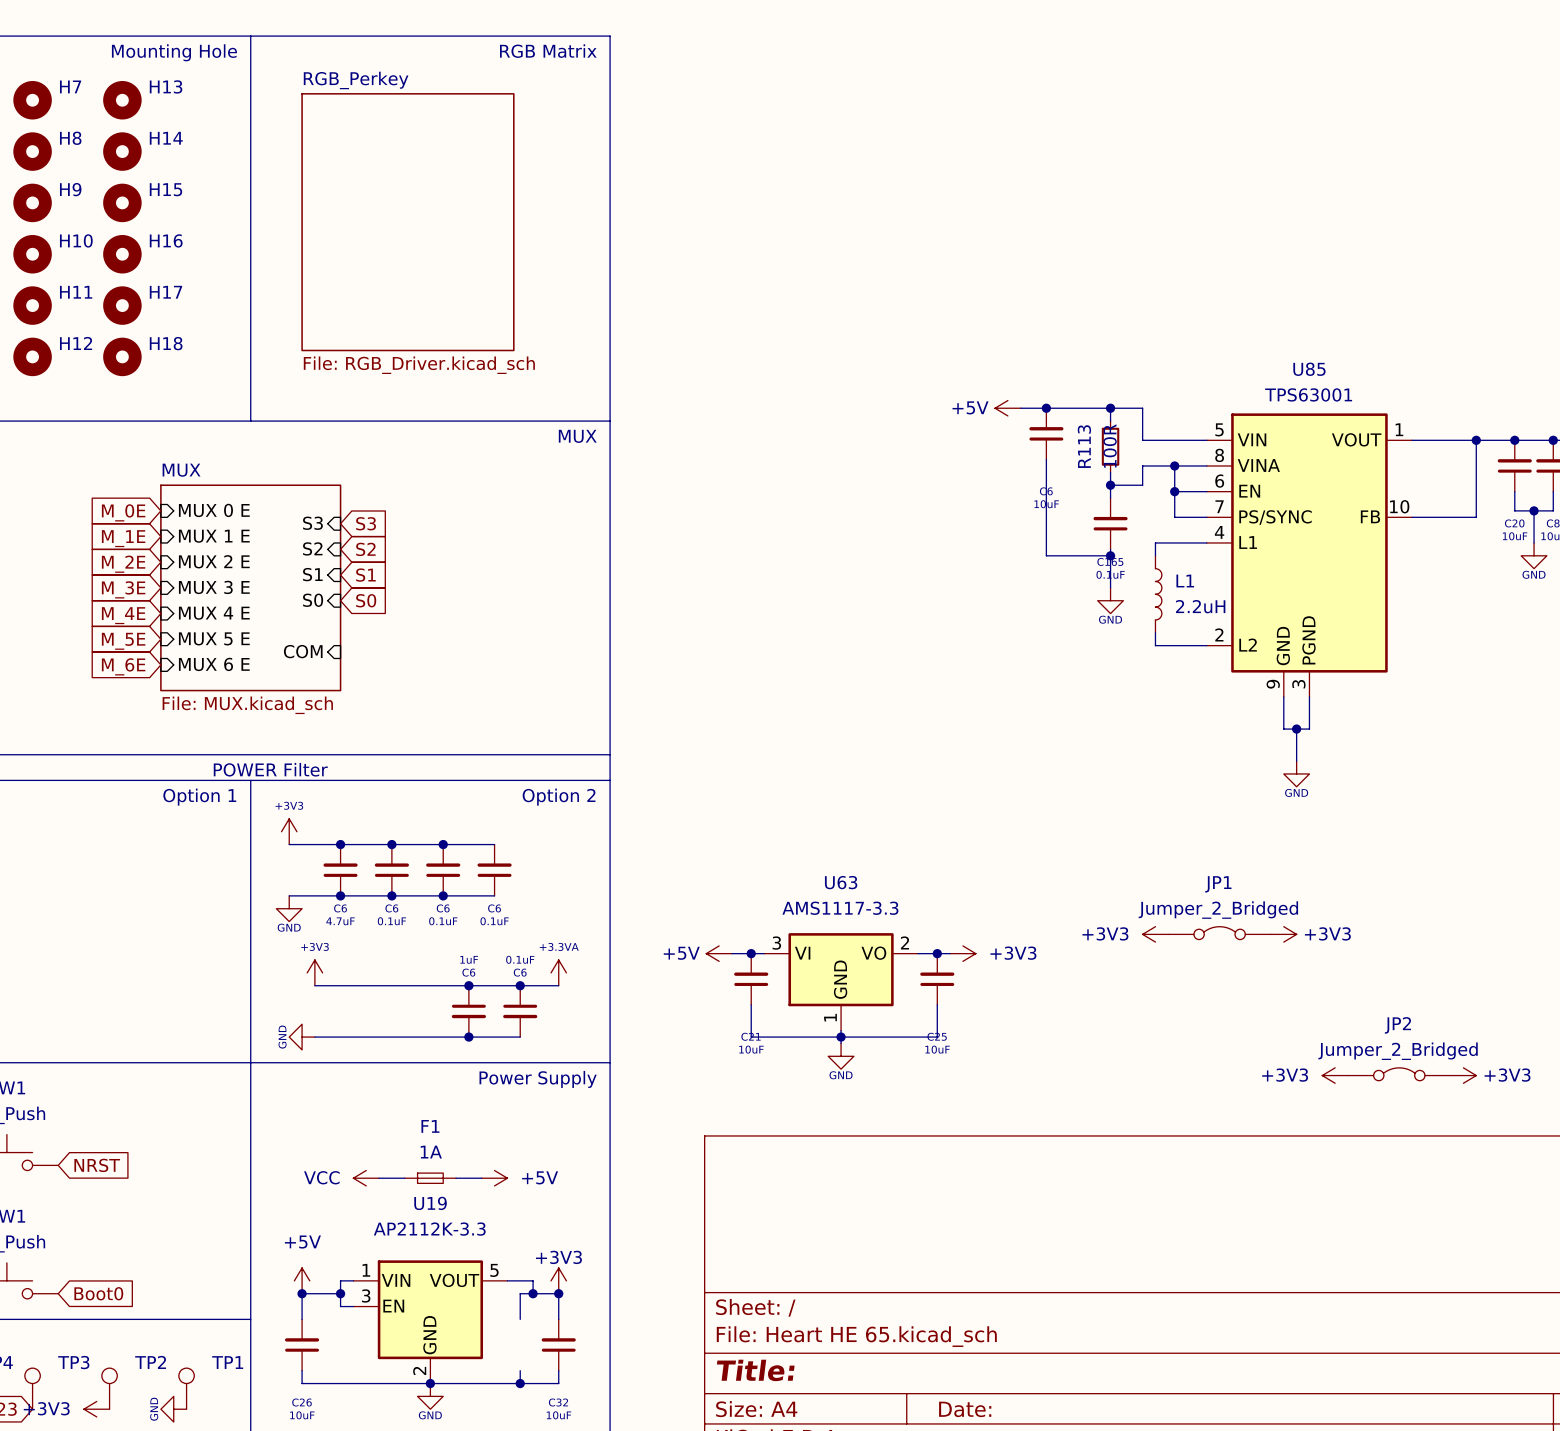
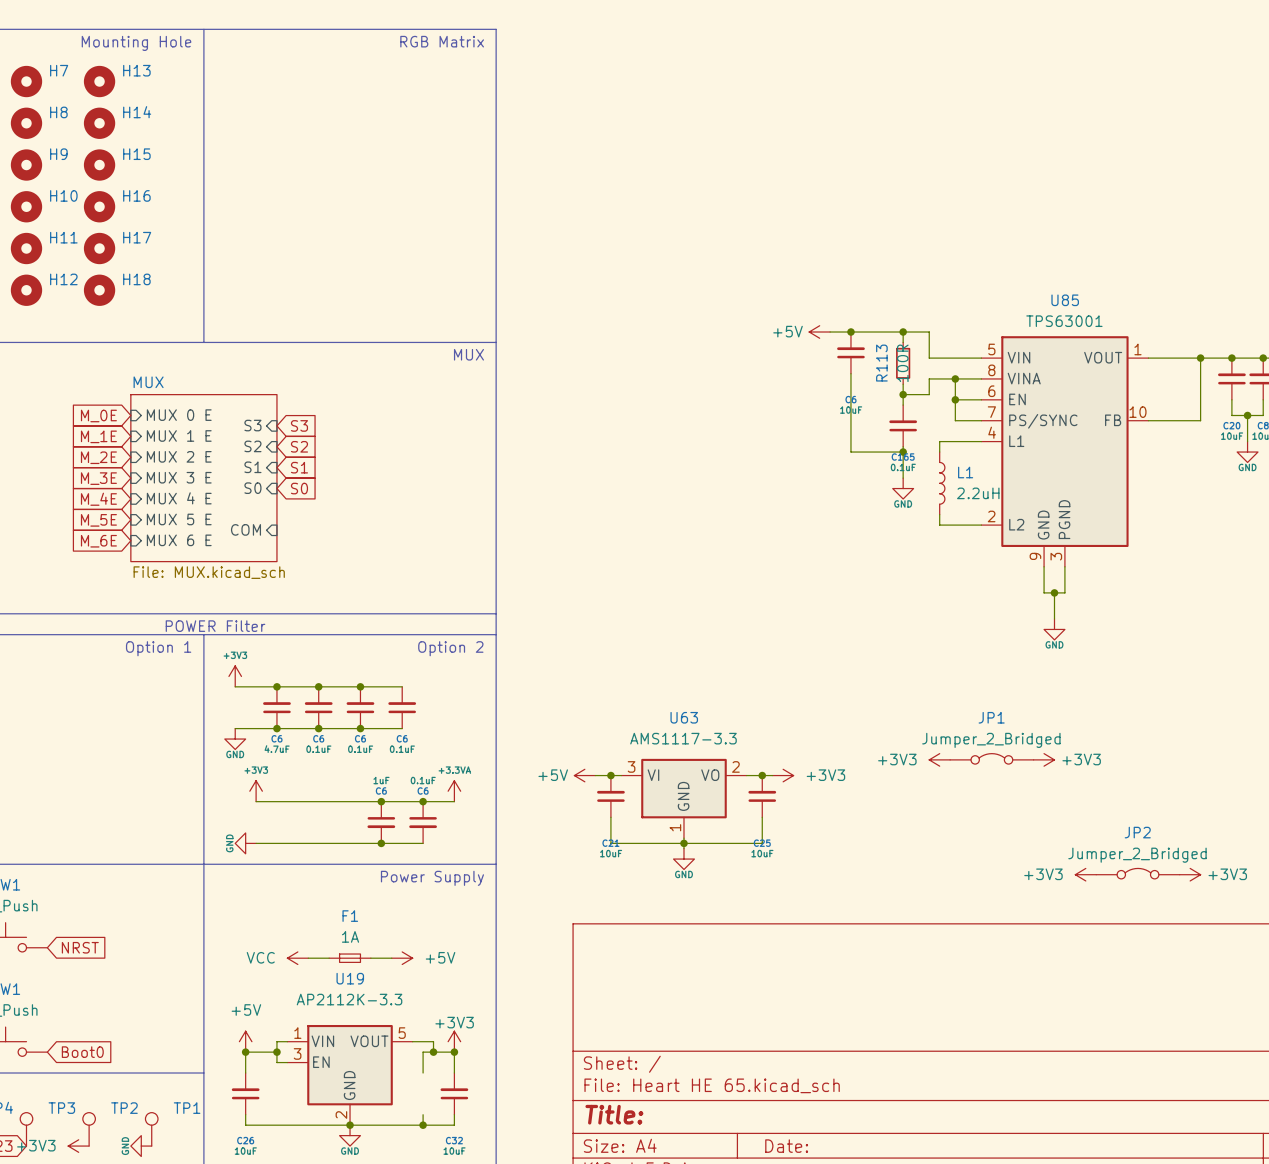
sheet RGB_Perkey: File: RGB_Driver.kicad_sch (407, 222) -> none

